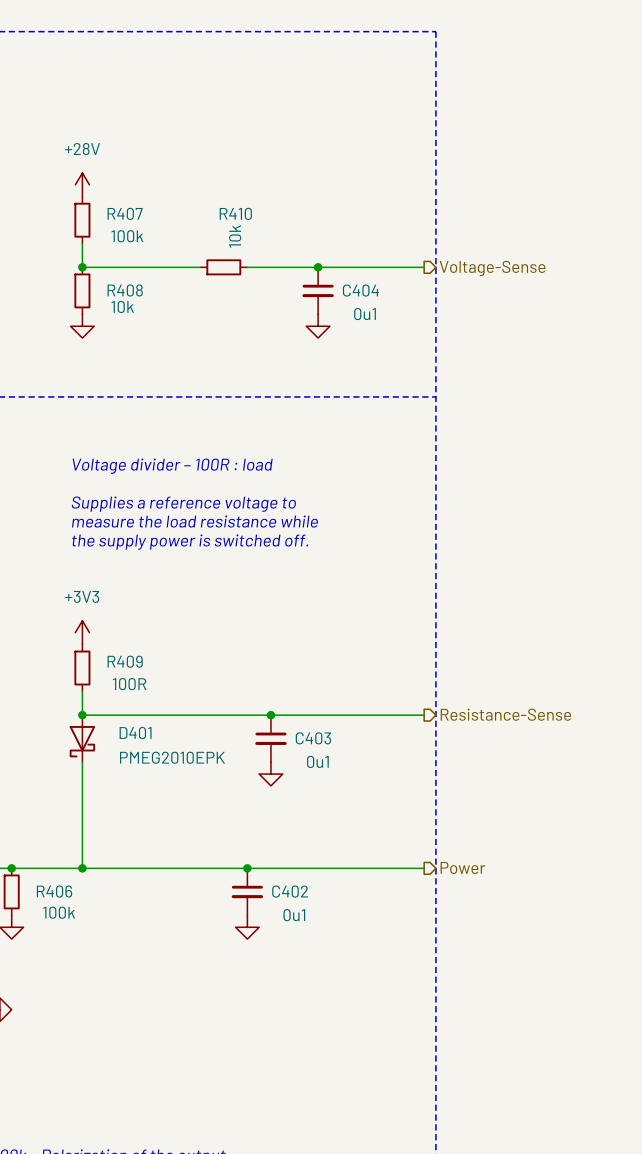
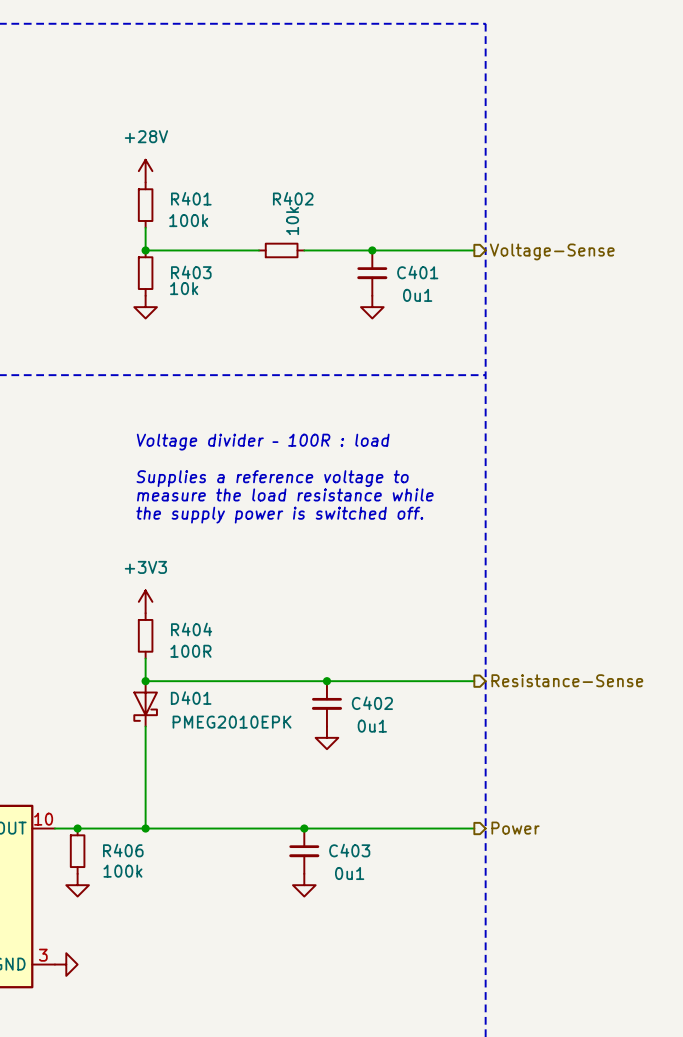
R407 name: R407 (125, 213) -> R401 (191, 198)
R410 name: R410 (235, 213) -> R402 (293, 198)
R408 name: R408 (125, 290) -> R403 (191, 272)
C404 name: C404 (360, 290) -> C401 (417, 272)
R409 name: R409 (125, 661) -> R404 (191, 629)
C403 name: C403 (313, 738) -> C402 (372, 703)
C402 name: C402 (290, 891) -> C403 (349, 850)

